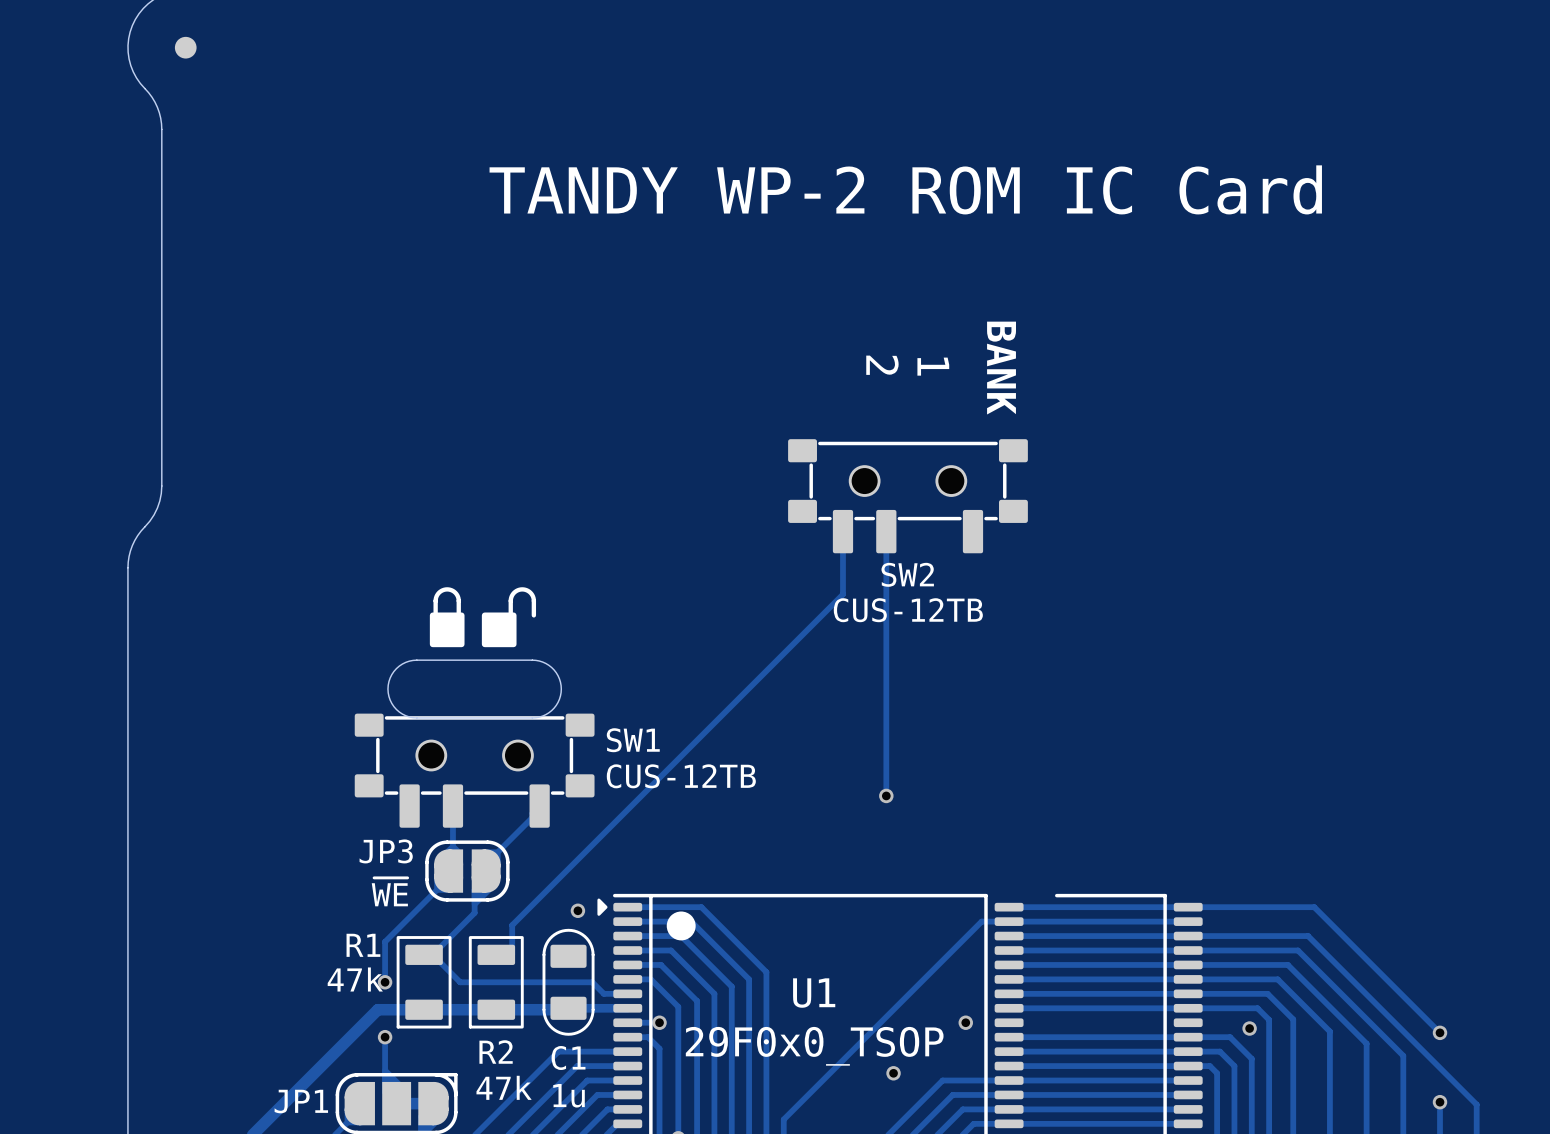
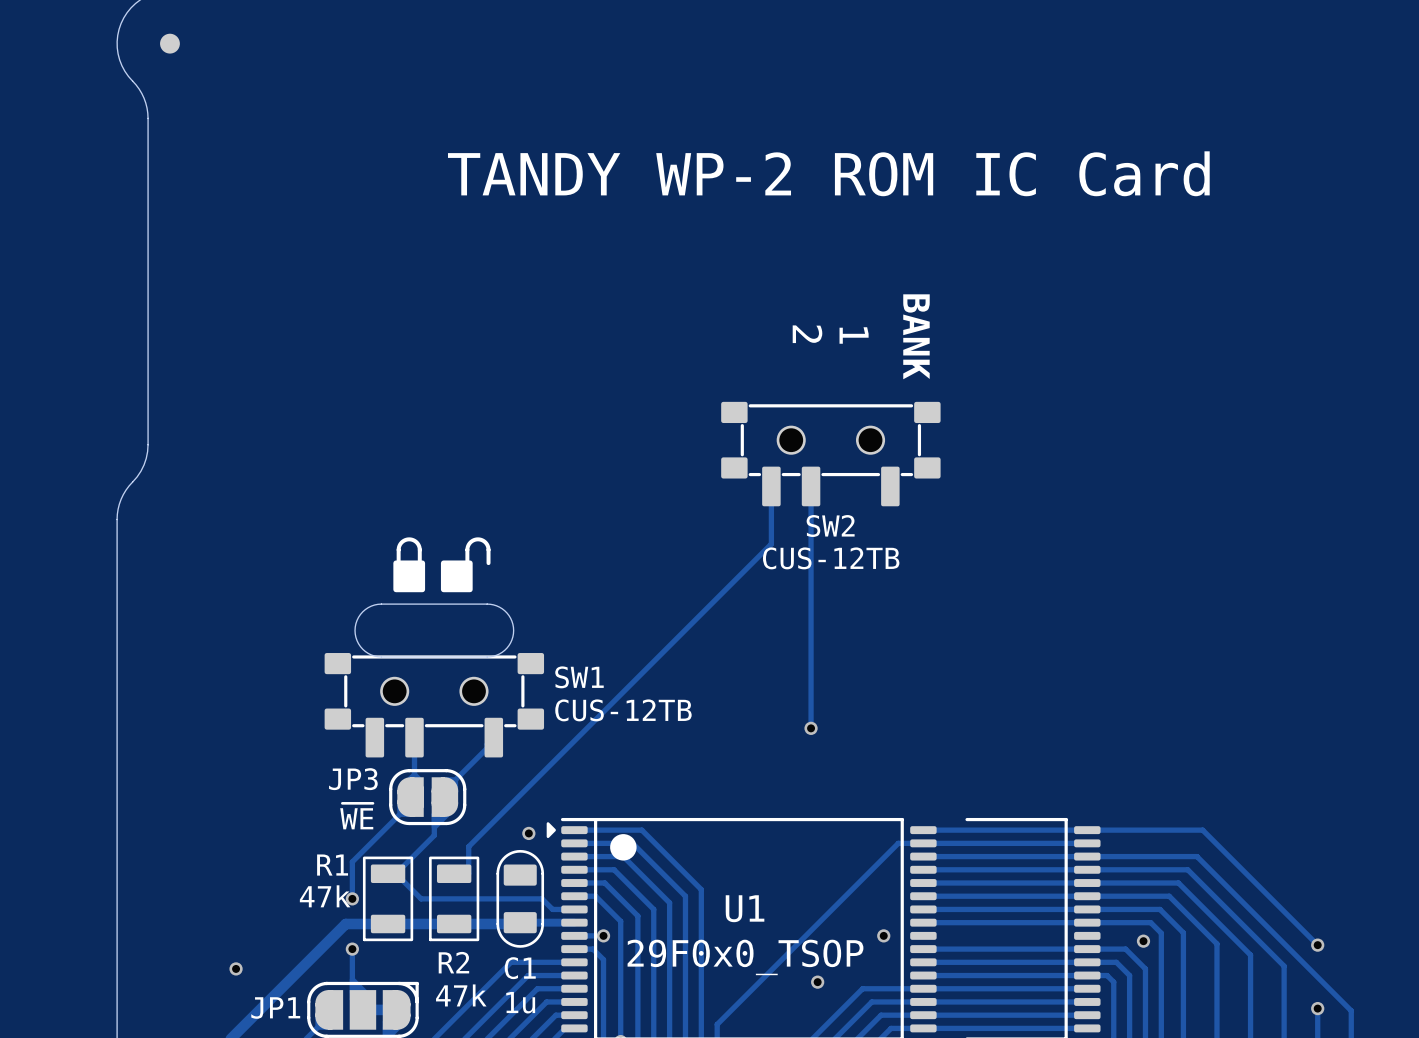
via: none -> (236, 968)

